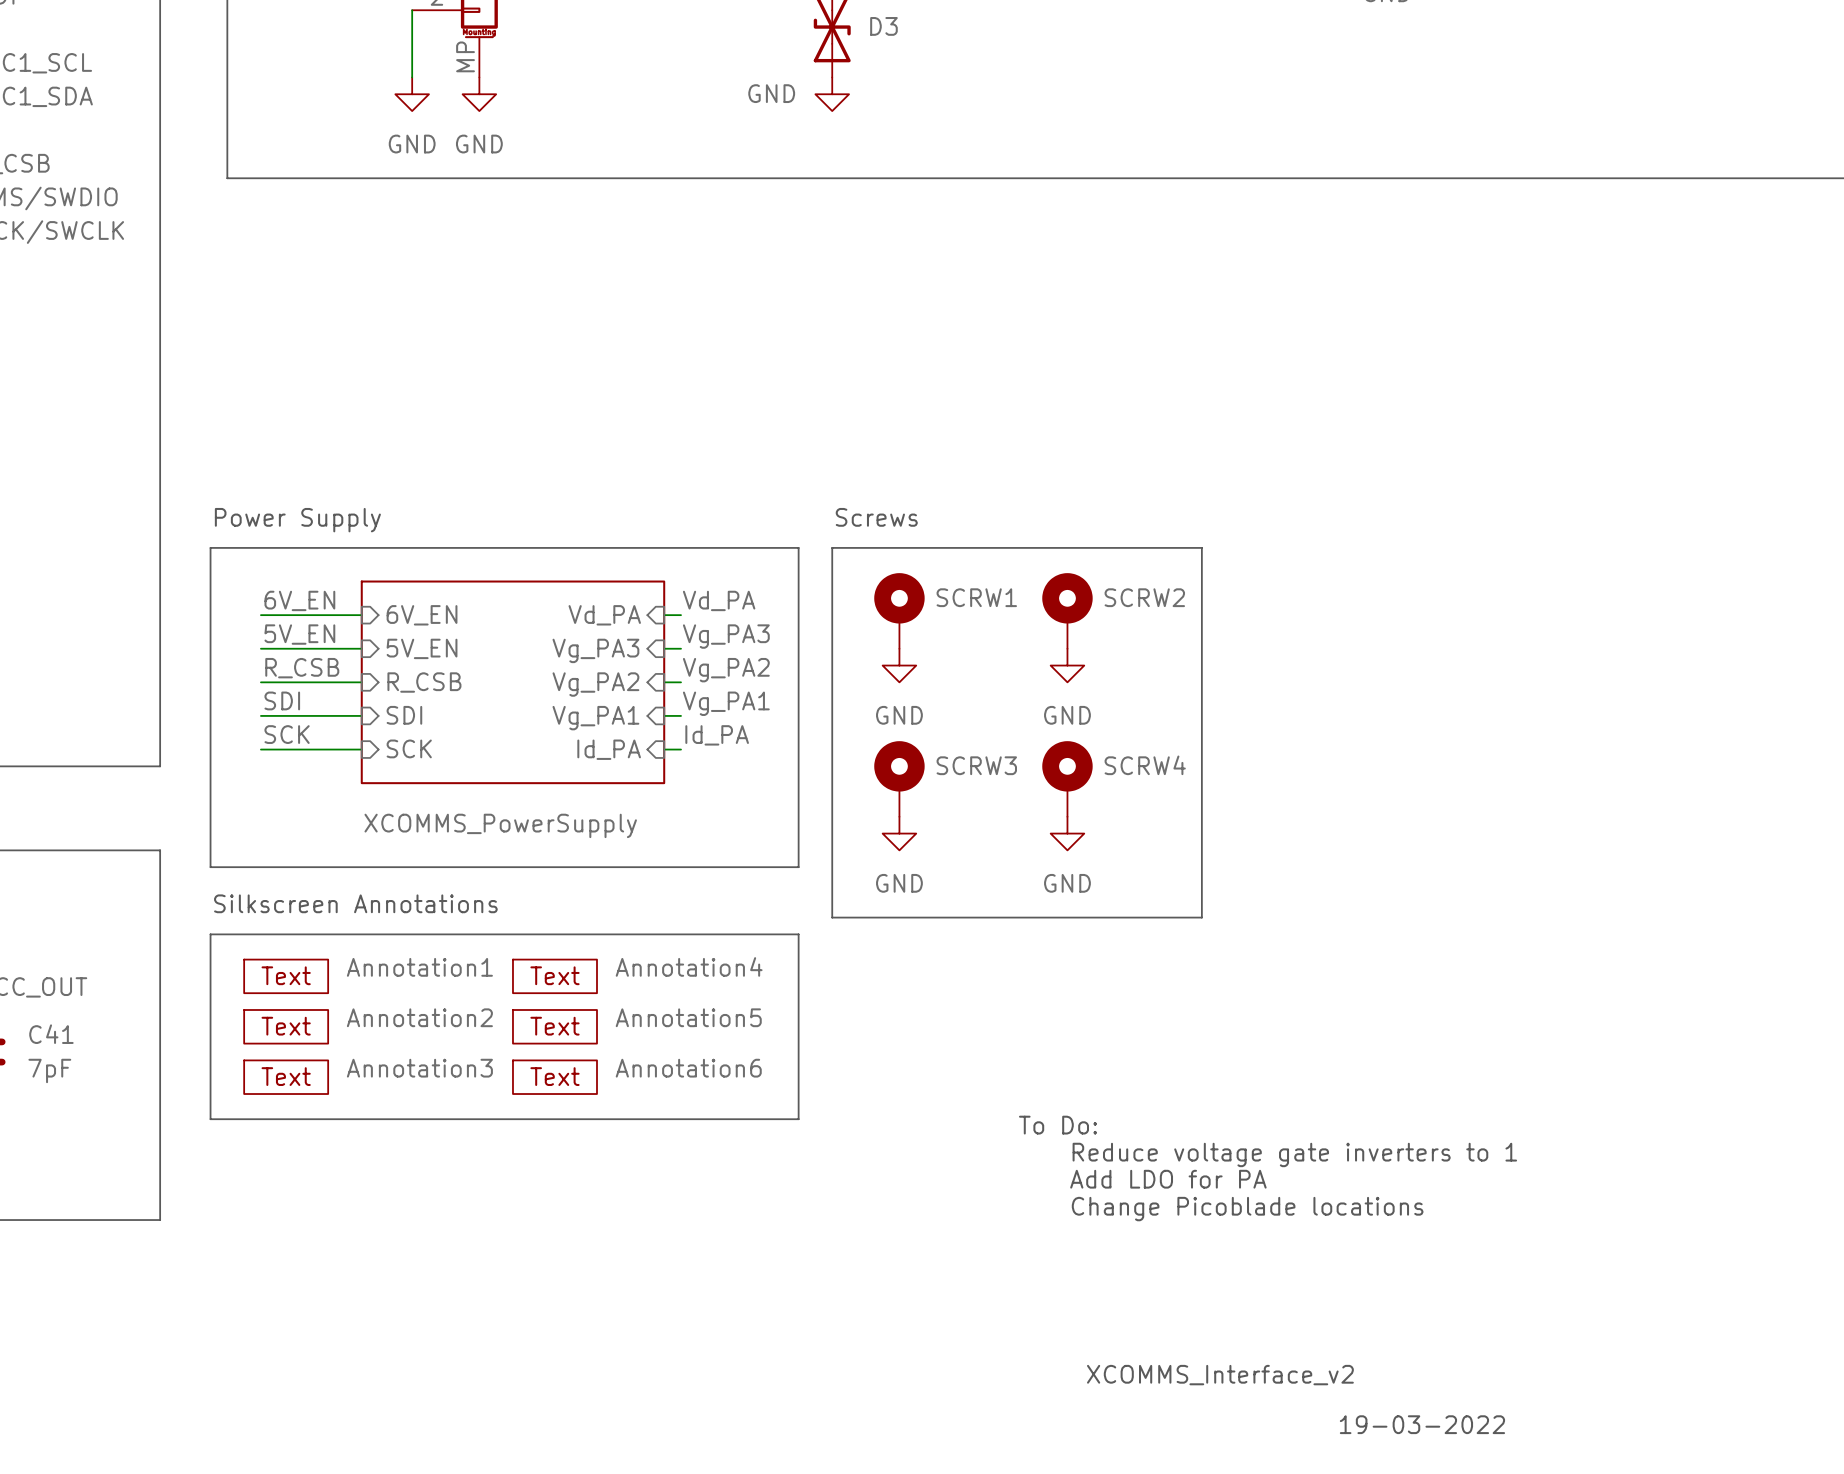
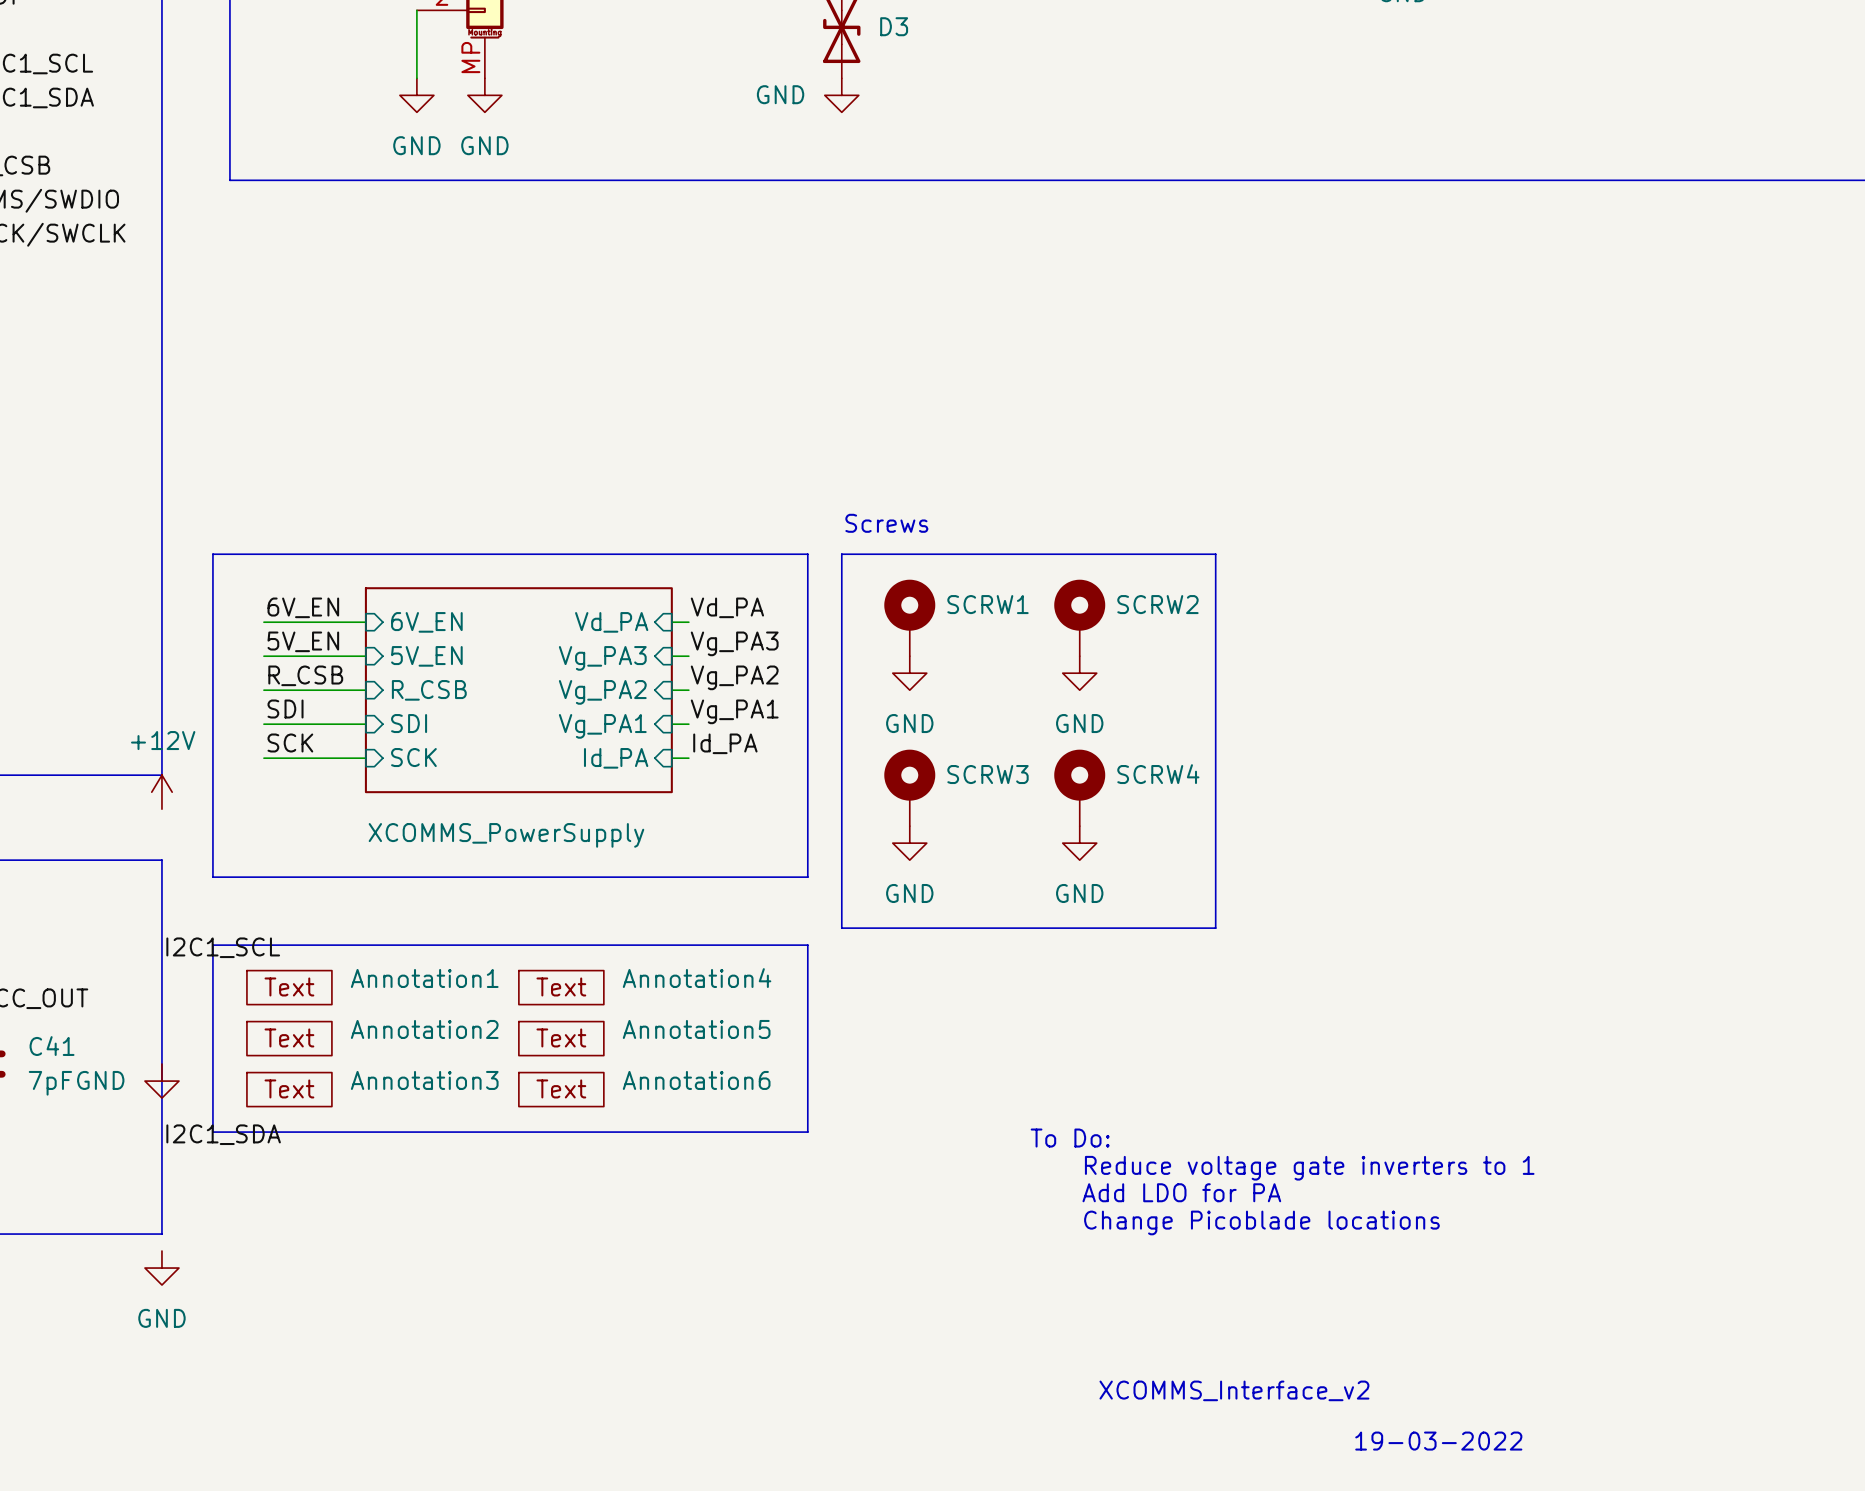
text: Power Supply (297, 520) -> none
power symbol: none -> +12V (161, 792)
text: Silkscreen Annotations (355, 903) -> none
label: none -> I2C1_SCL (223, 947)
power symbol: none -> GND (161, 1081)
label: none -> I2C1_SDA (223, 1134)
power symbol: none -> GND (161, 1268)

